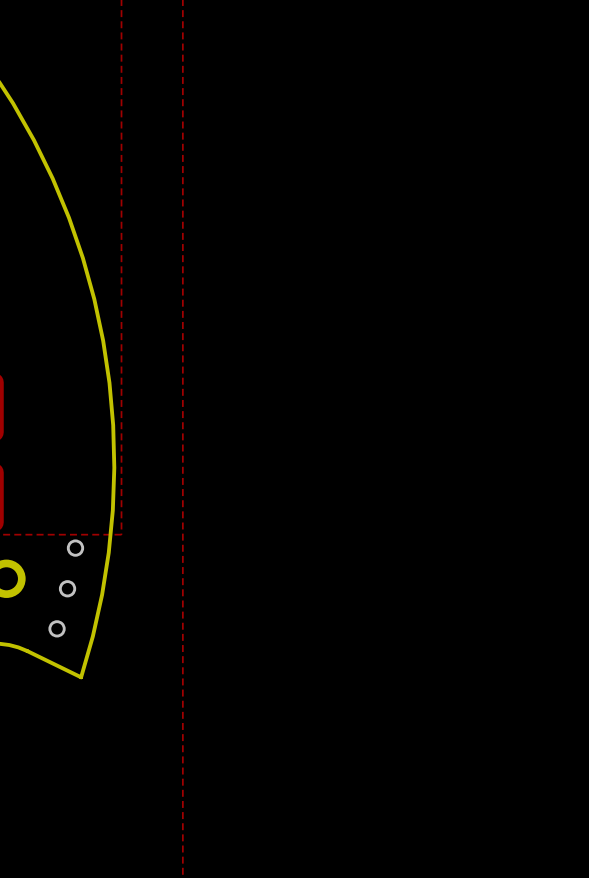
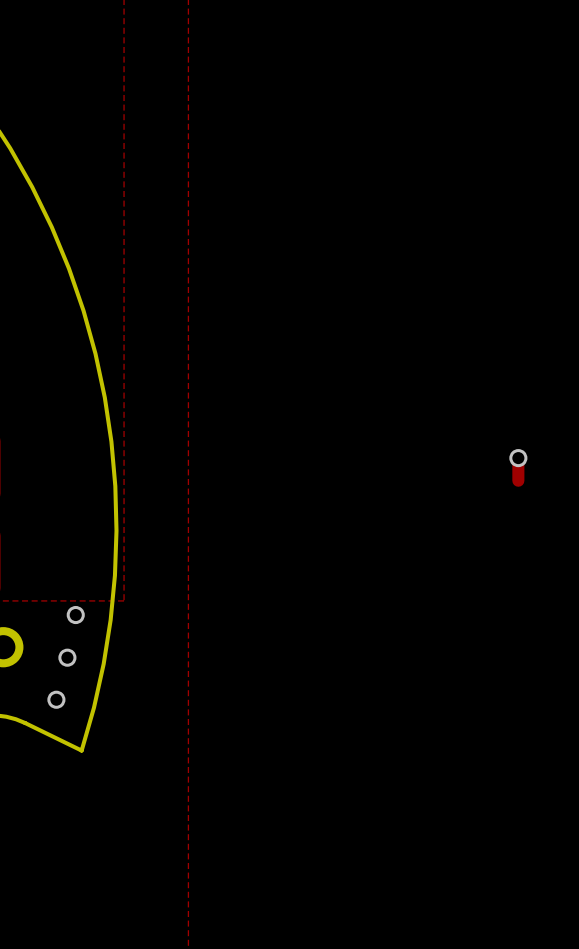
track: none -> (518, 458) (518, 480)
via: none -> (518, 458)

